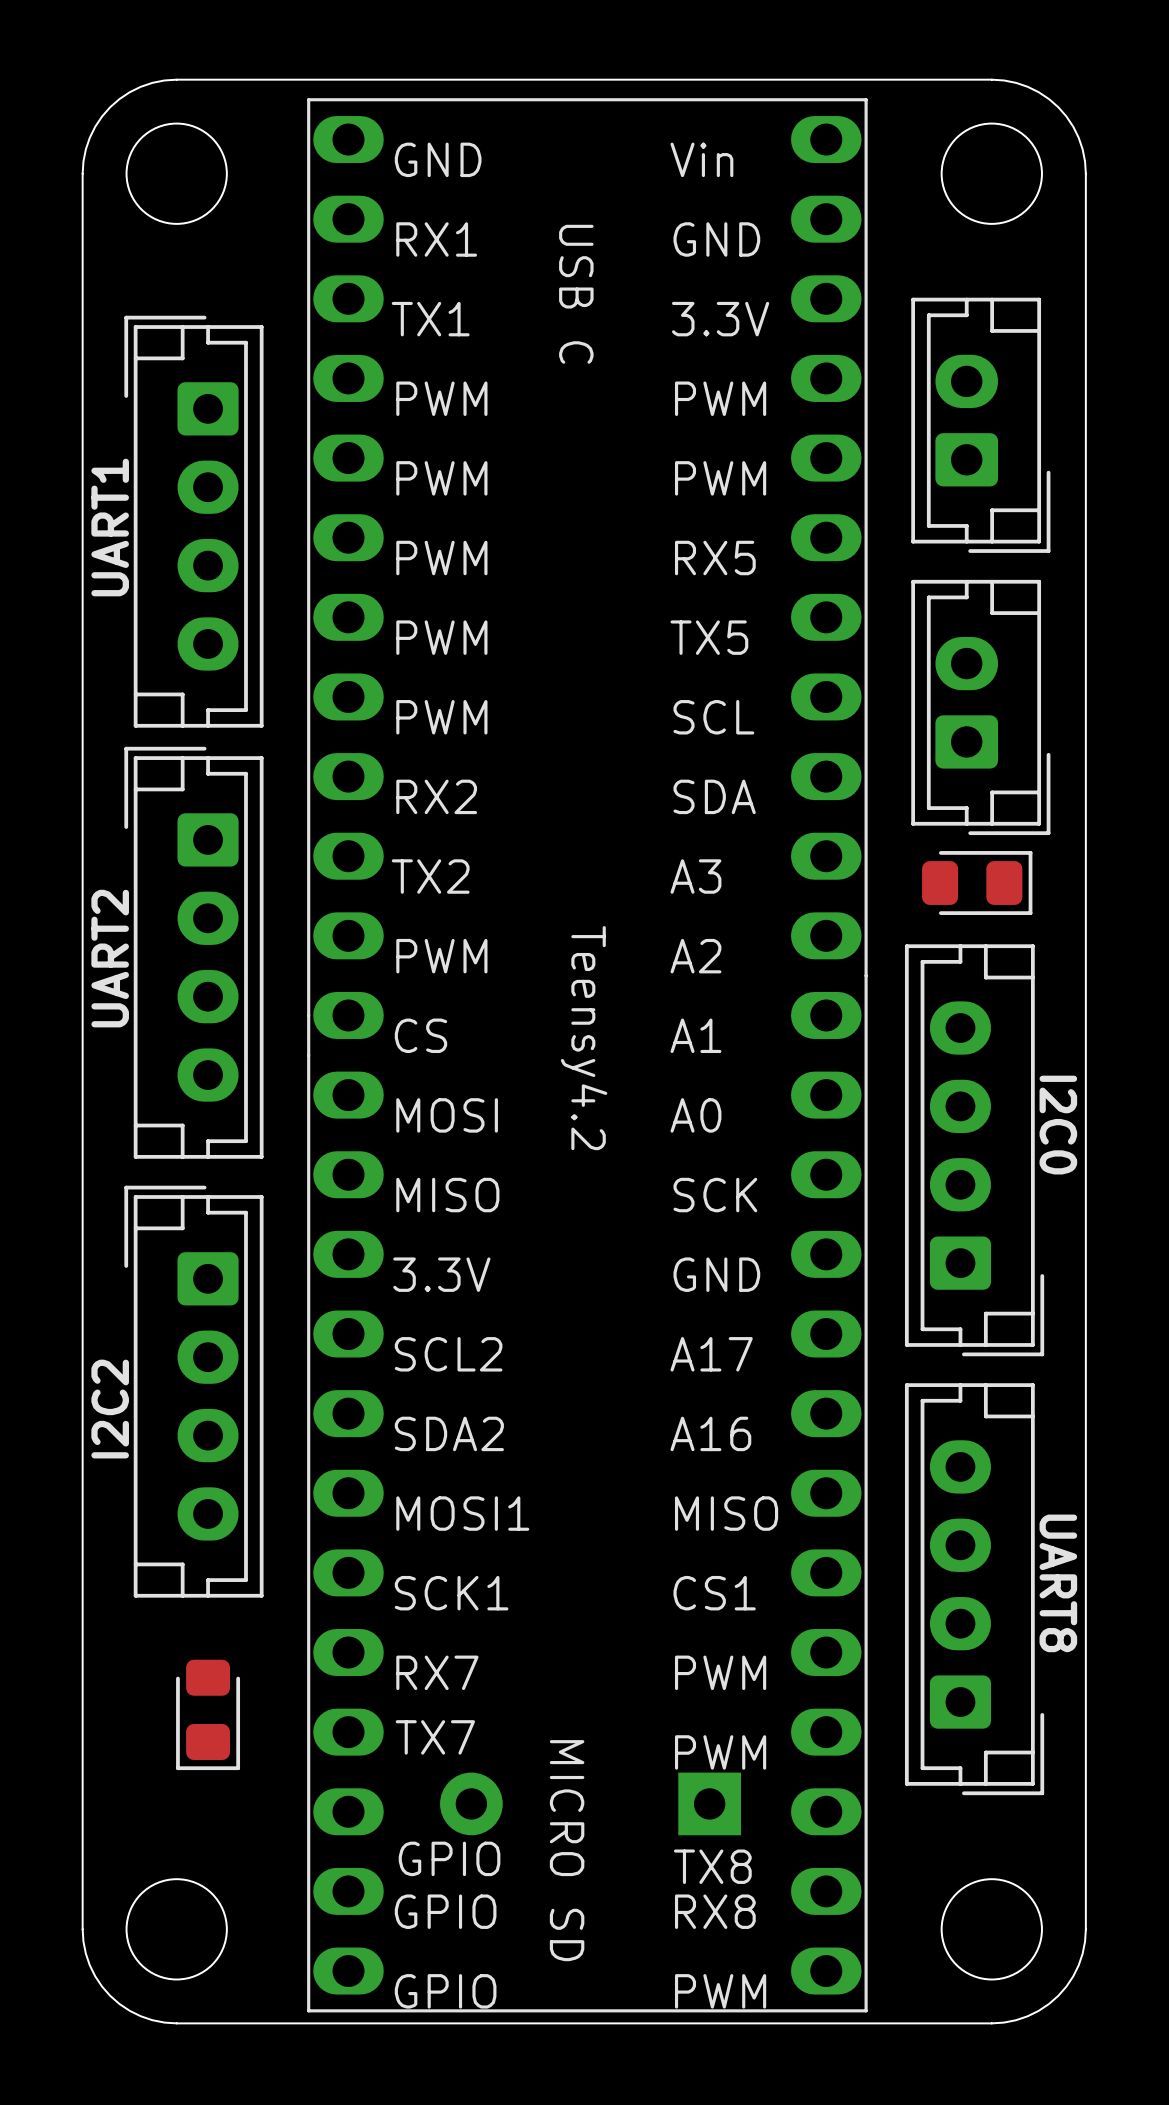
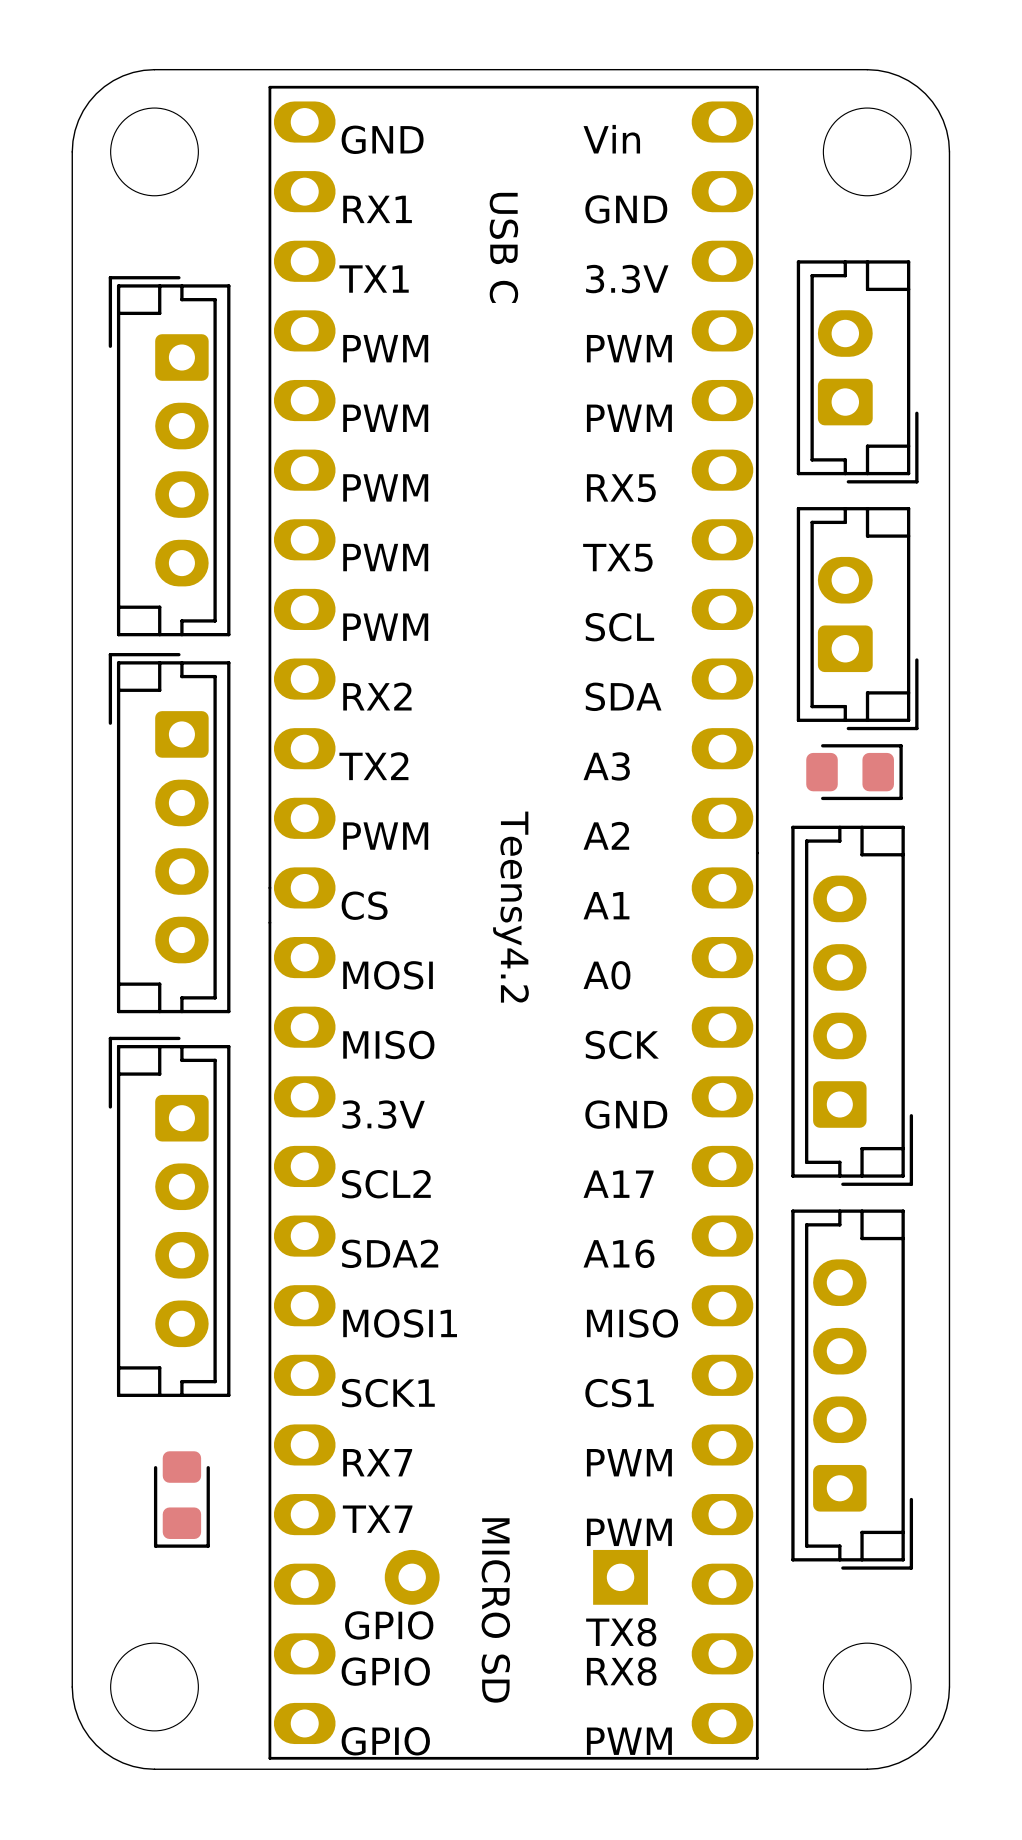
text: UART1 (110, 527) -> none
text: UART2 (110, 958) -> none
text: I2C0 (1058, 1125) -> none
text: I2C2 (110, 1409) -> none
text: UART8 (1058, 1583) -> none

